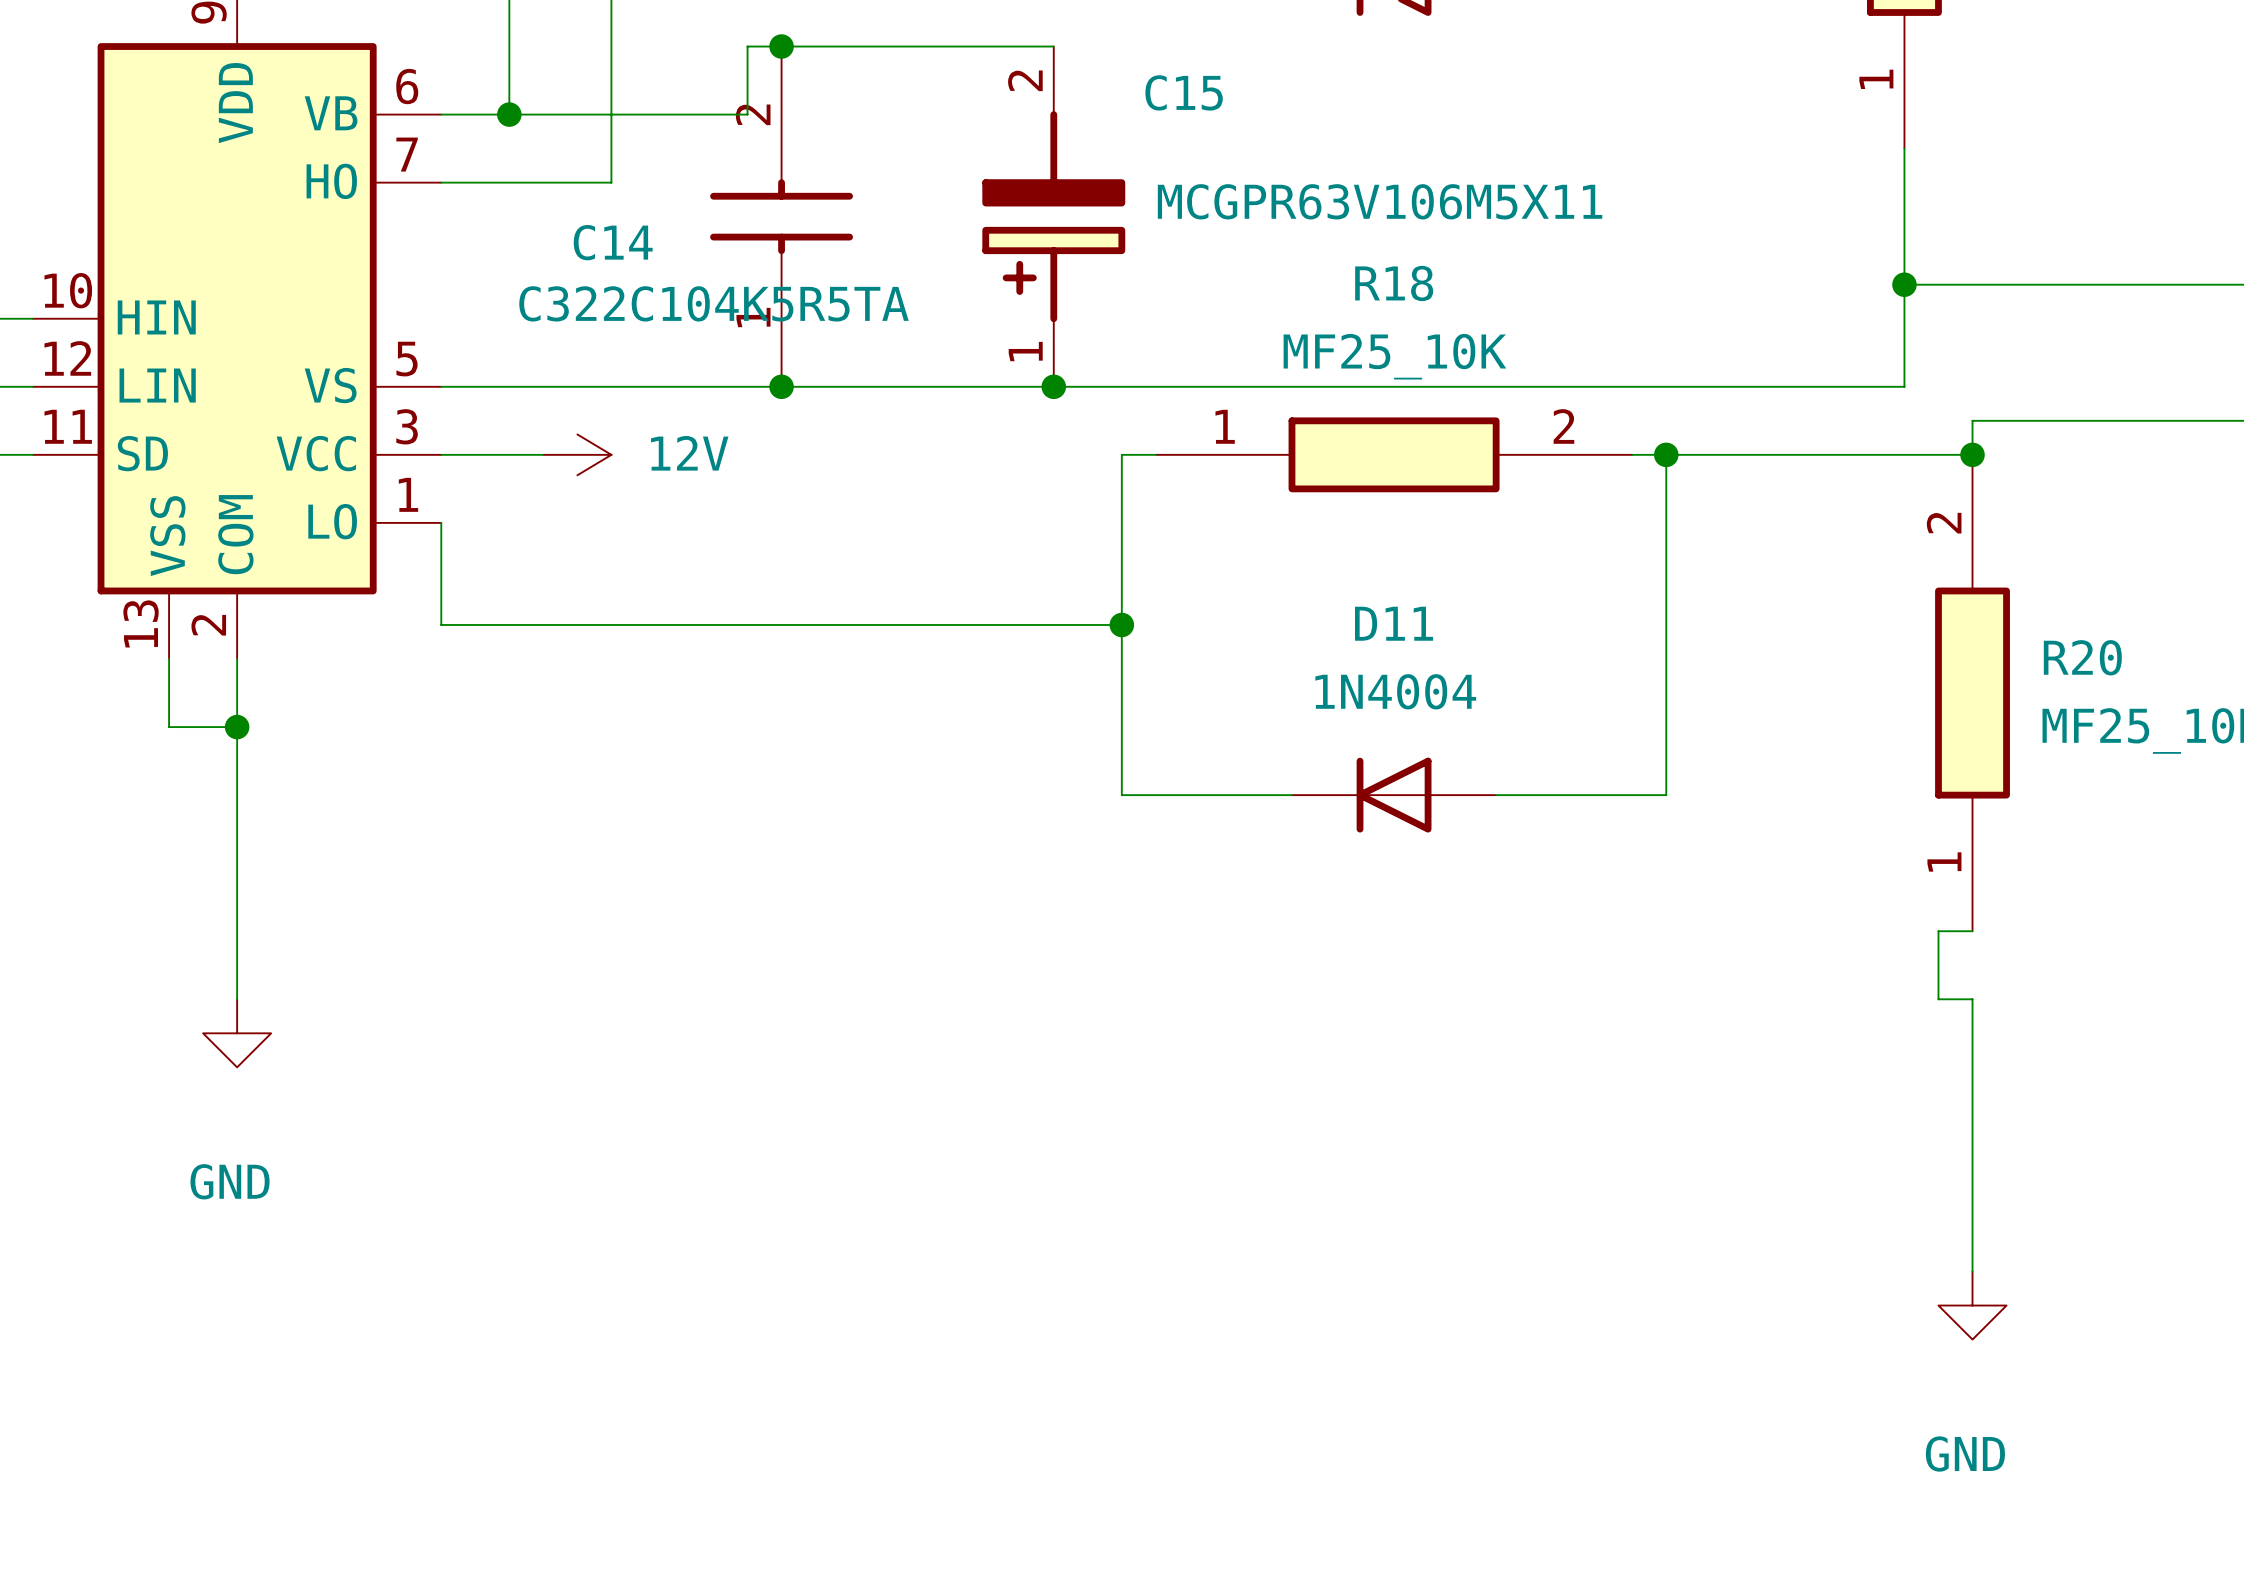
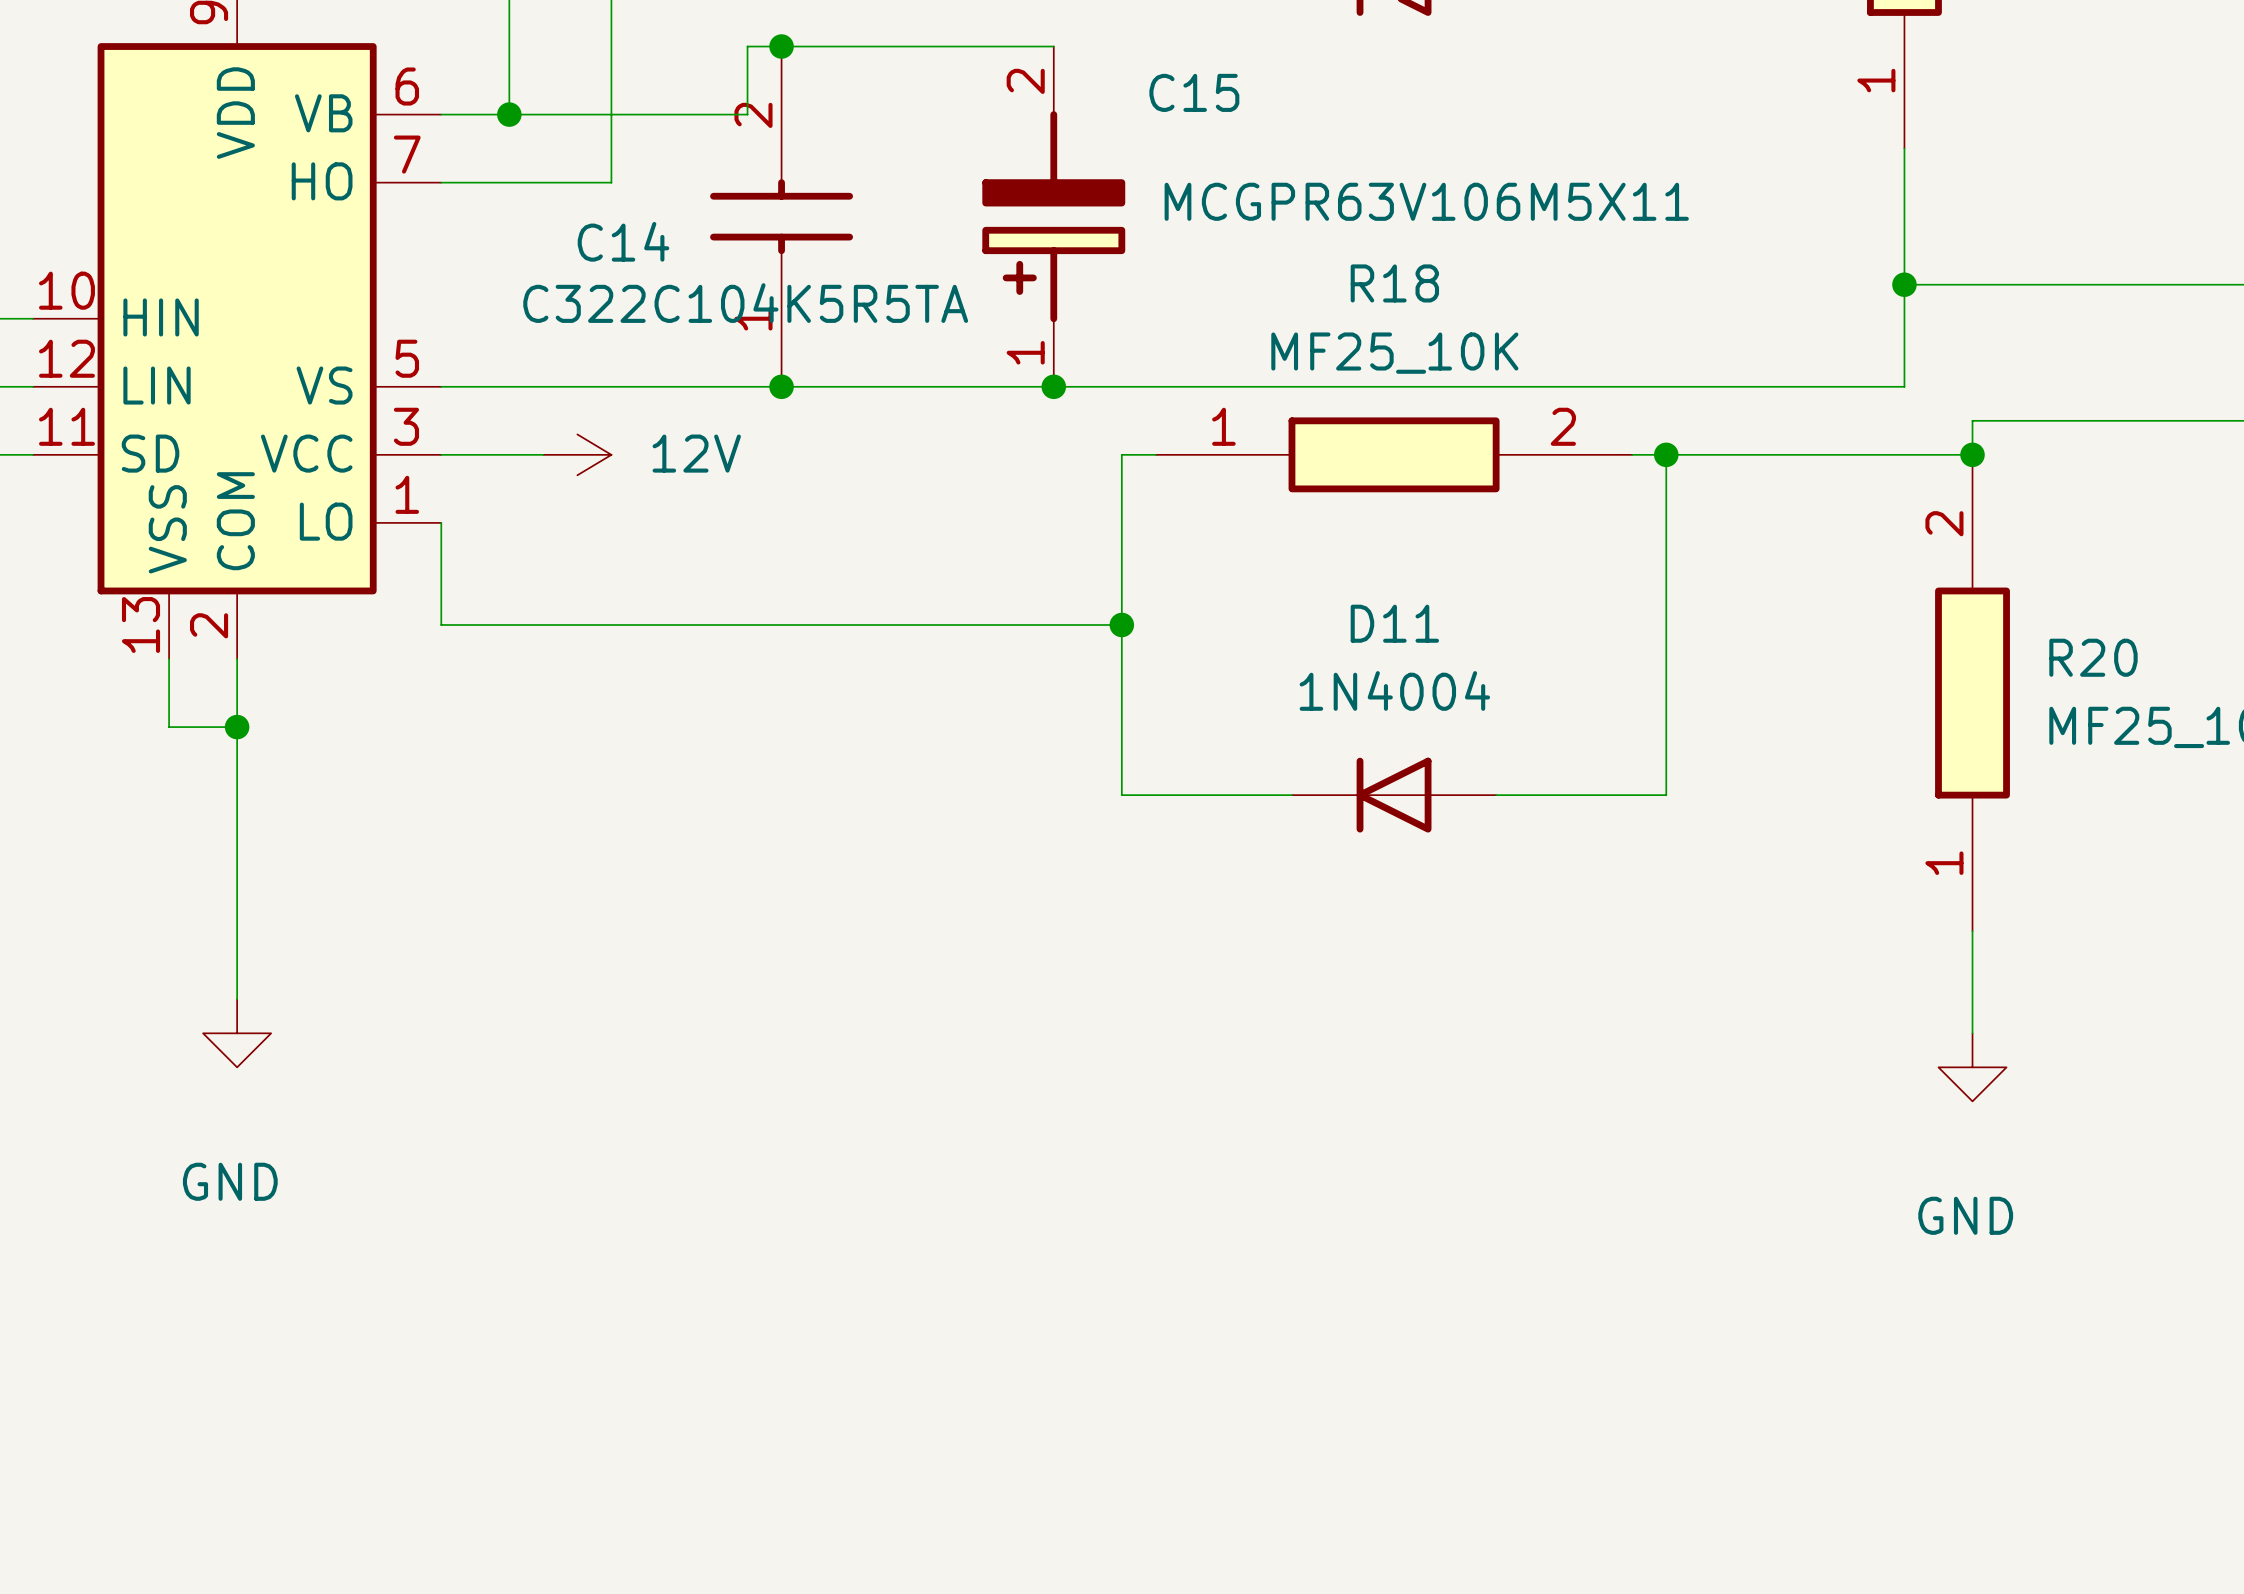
wire: (1972, 931) (1938, 931) (1938, 999) (1972, 999) -> (1972, 931) (1972, 999)
wire: (1972, 1033) (1972, 1271) -> none
power symbol position: GND (1972, 1305) -> GND (1972, 1067)

